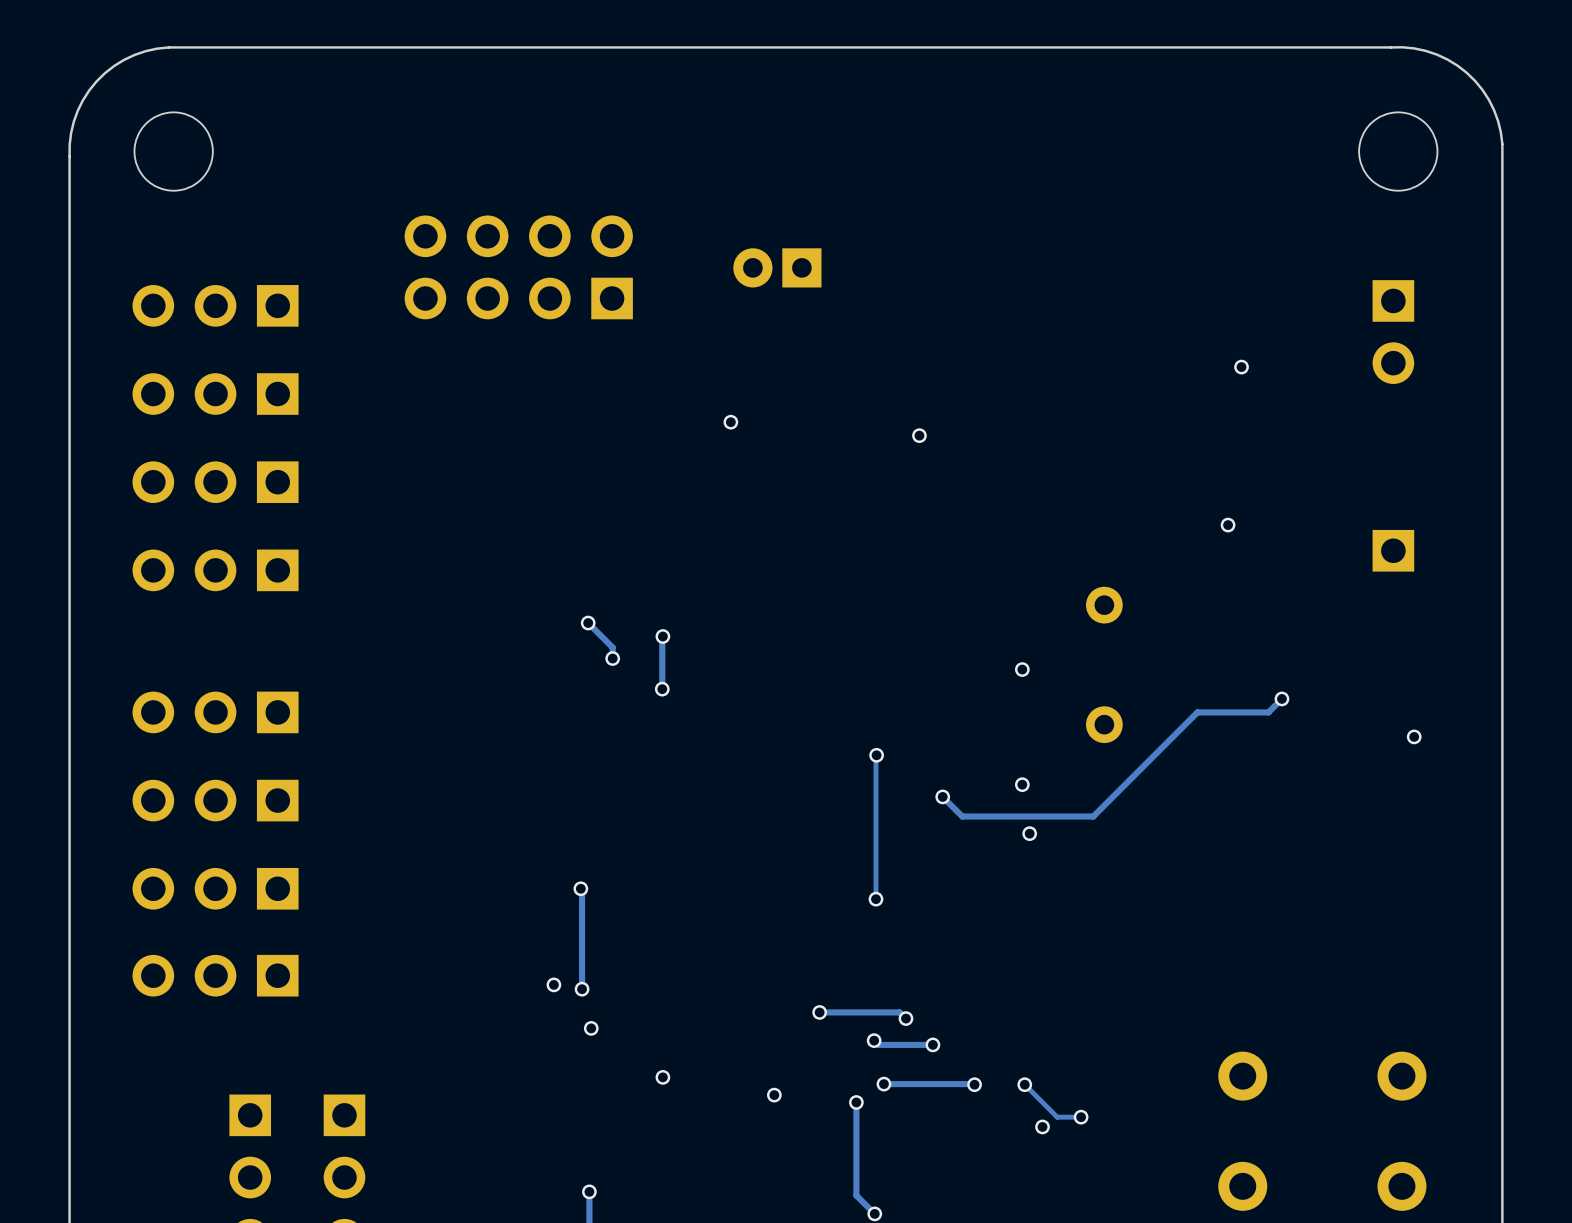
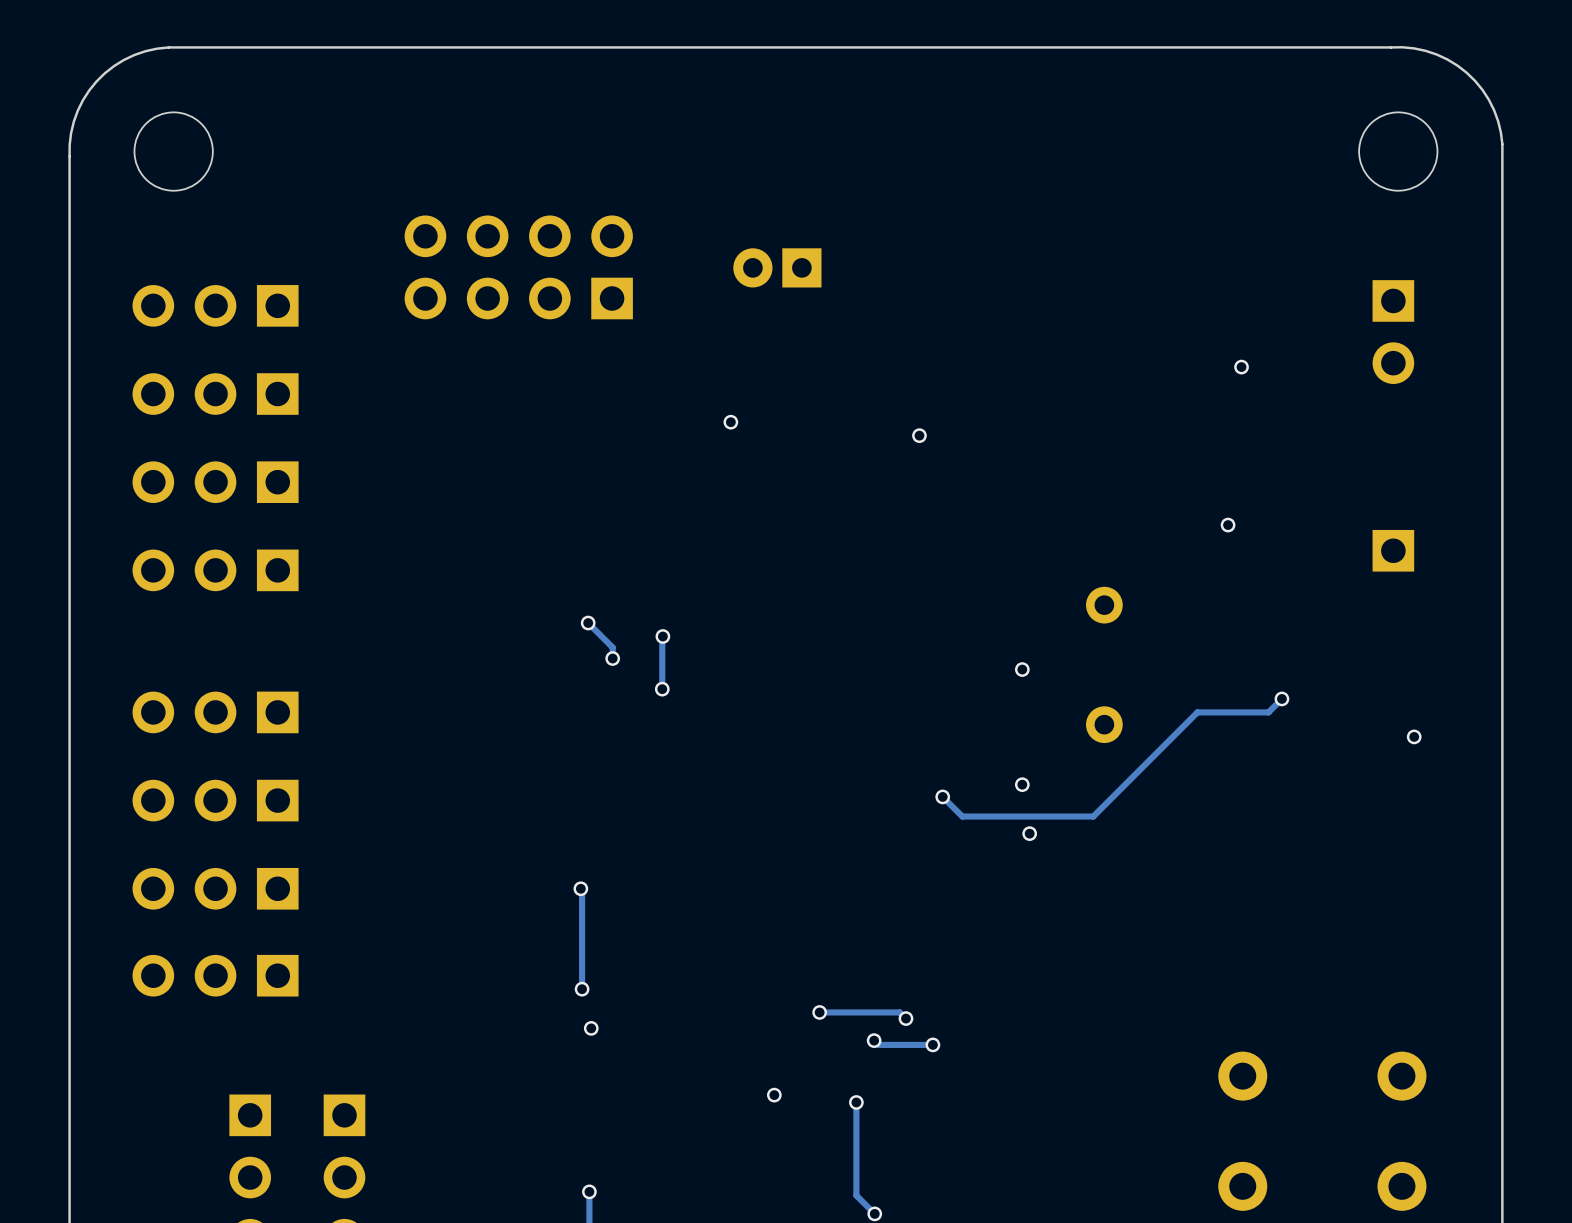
track: (876, 755) (875, 899) -> none
via: (876, 755) -> none
via: (875, 899) -> none
via: (553, 984) -> none
via: (662, 1077) -> none
track: (883, 1084) (974, 1084) -> none
via: (883, 1084) -> none
via: (974, 1084) -> none
track: (1024, 1084) (1057, 1117) (1081, 1117) -> none
via: (1024, 1084) -> none
via: (1081, 1117) -> none
via: (1042, 1126) -> none

